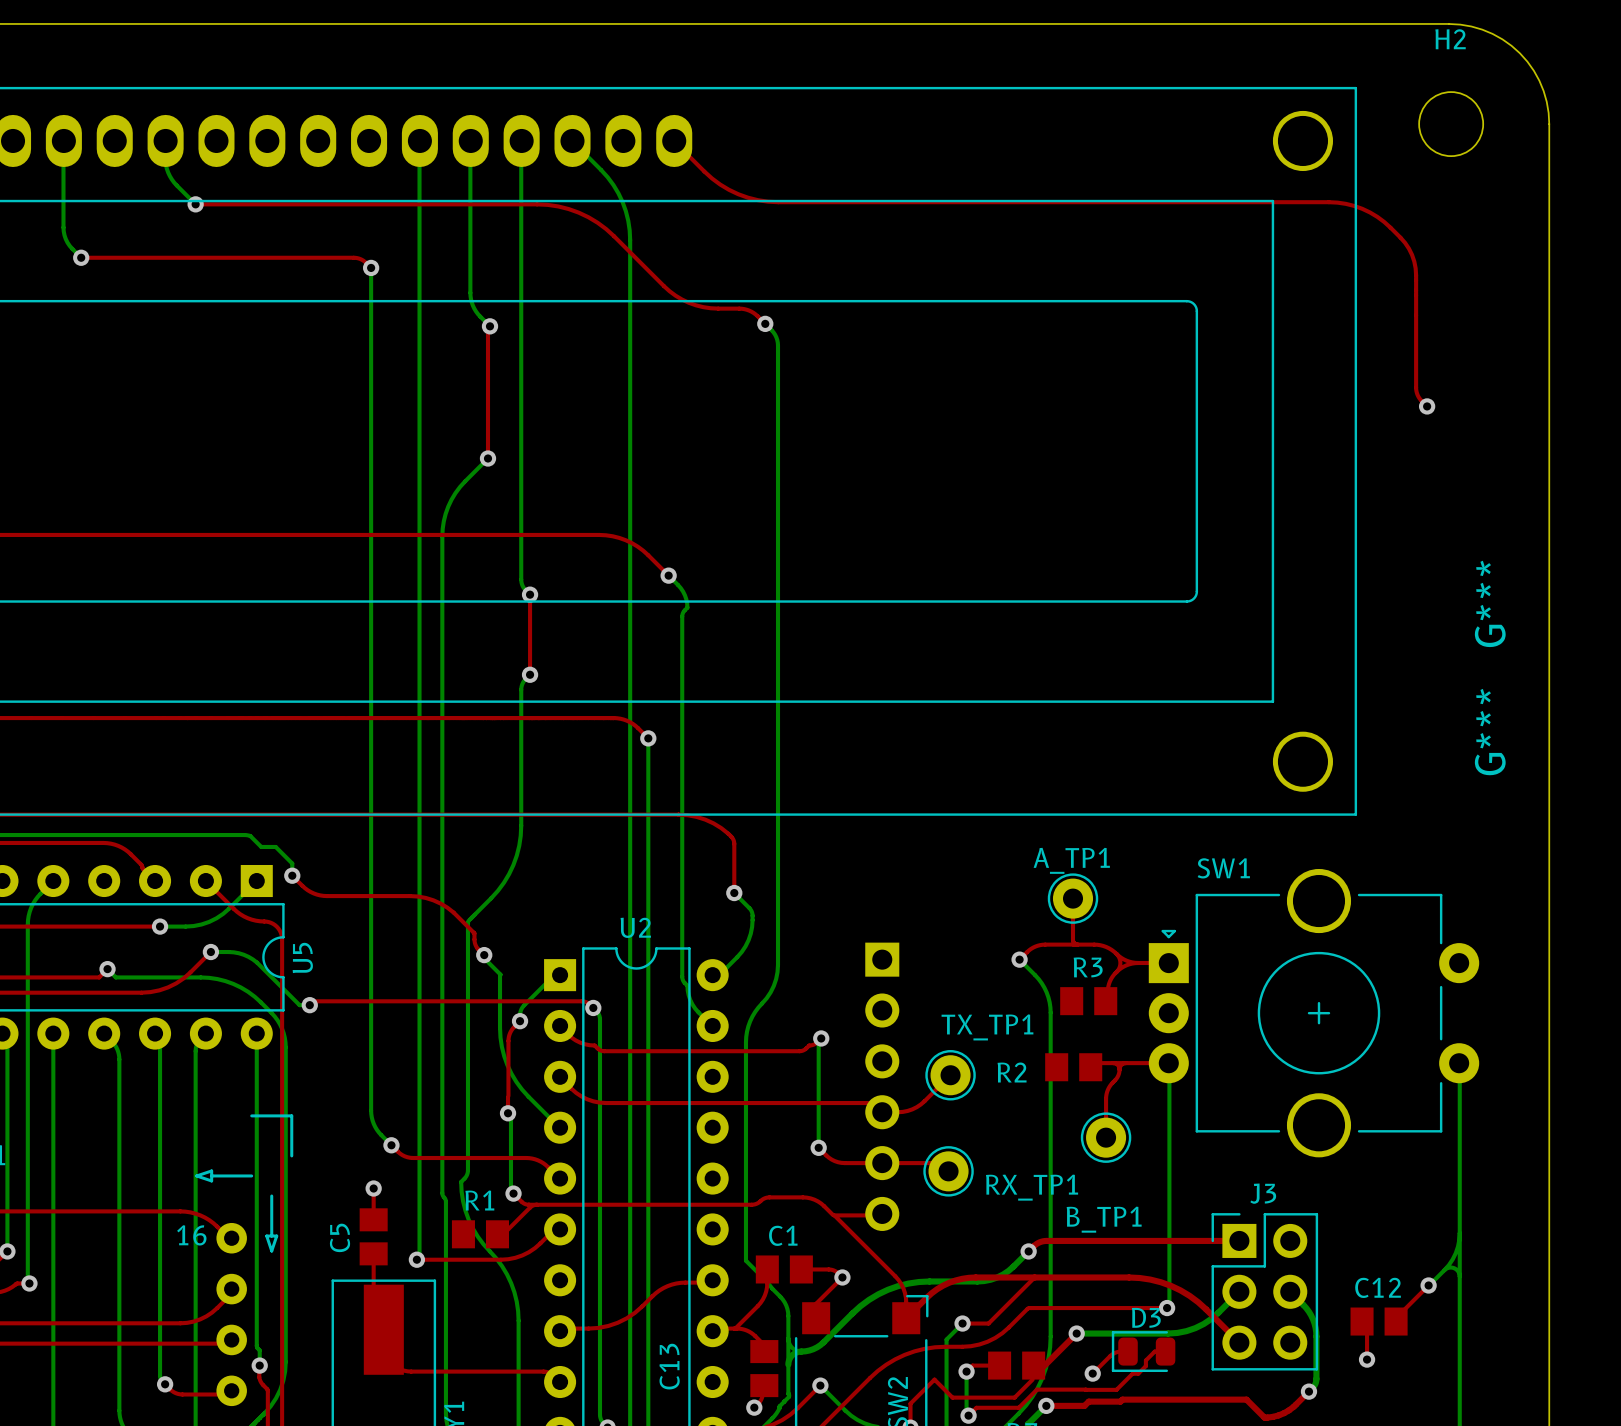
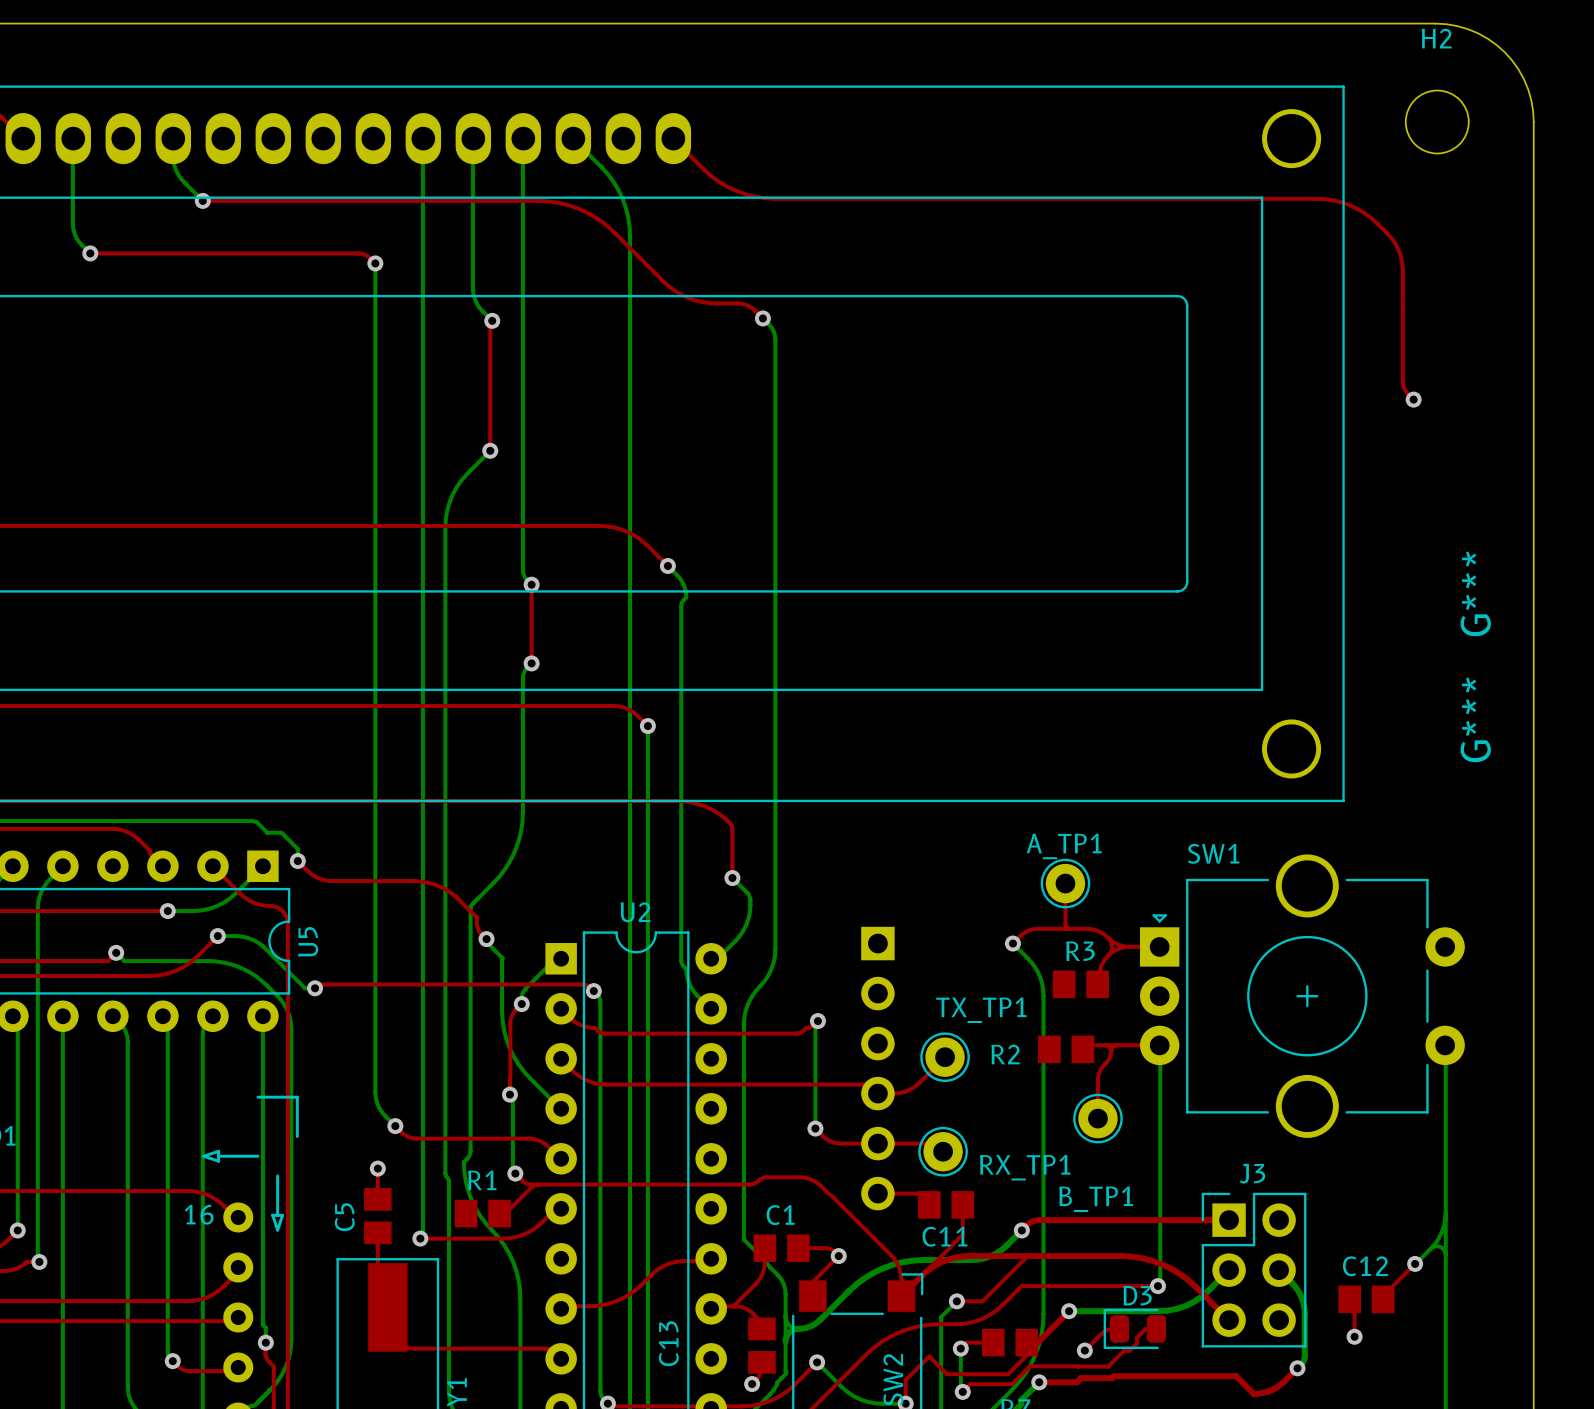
top track: none -> (877, 1193) (918, 1193) (929, 1204)
top track: (833, 1215) (880, 1215) -> none
C11: none -> (946, 1204)
top track: none -> (962, 1204) (962, 1234) (901, 1296)

